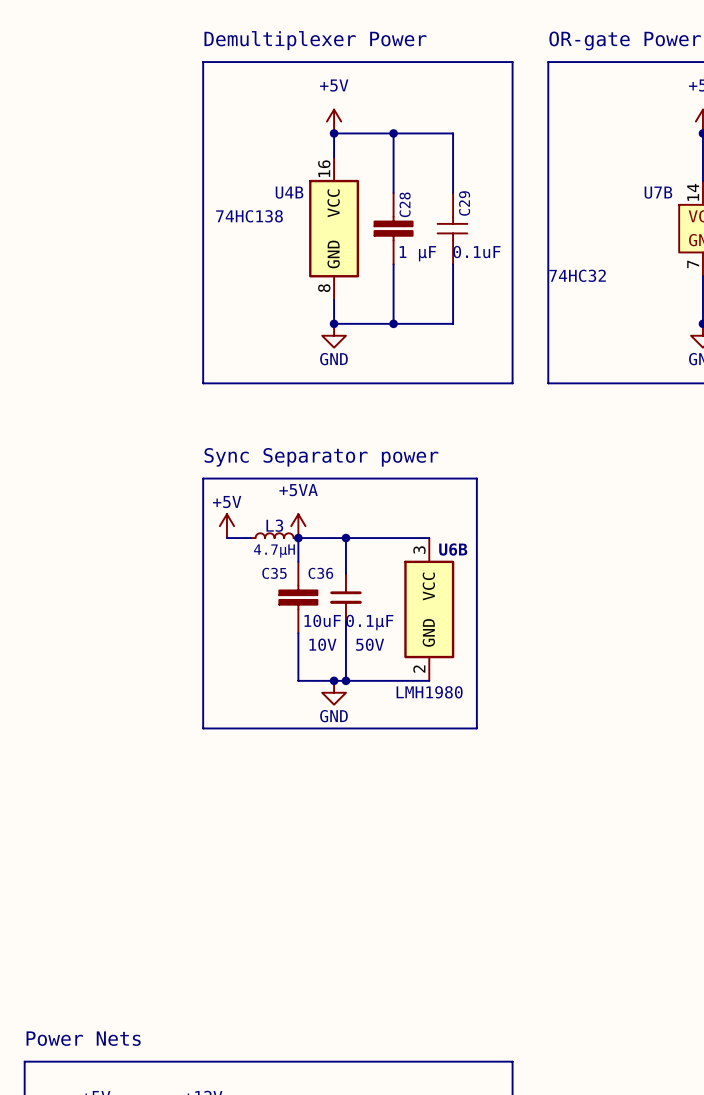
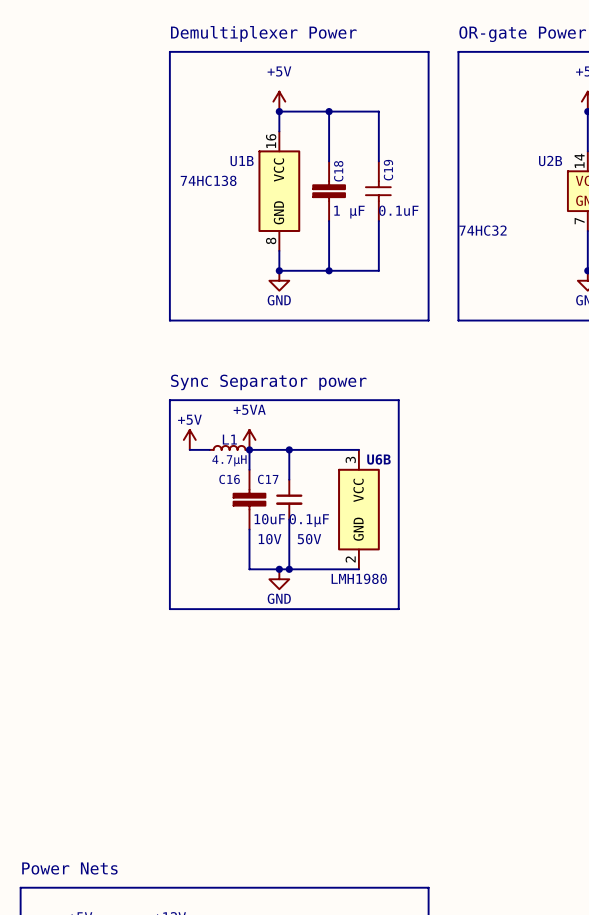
U4B name: U4B (289, 192) -> U1B (242, 161)
U7B name: U7B (658, 192) -> U2B (550, 160)
C29 name: C29 (464, 203) -> C19 (388, 170)
C28 name: C28 (405, 204) -> C18 (338, 171)
L3 name: L3 (274, 525) -> L1 (229, 439)
C35 name: C35 (274, 573) -> C16 (229, 479)
C36 name: C36 (320, 573) -> C17 (268, 479)

